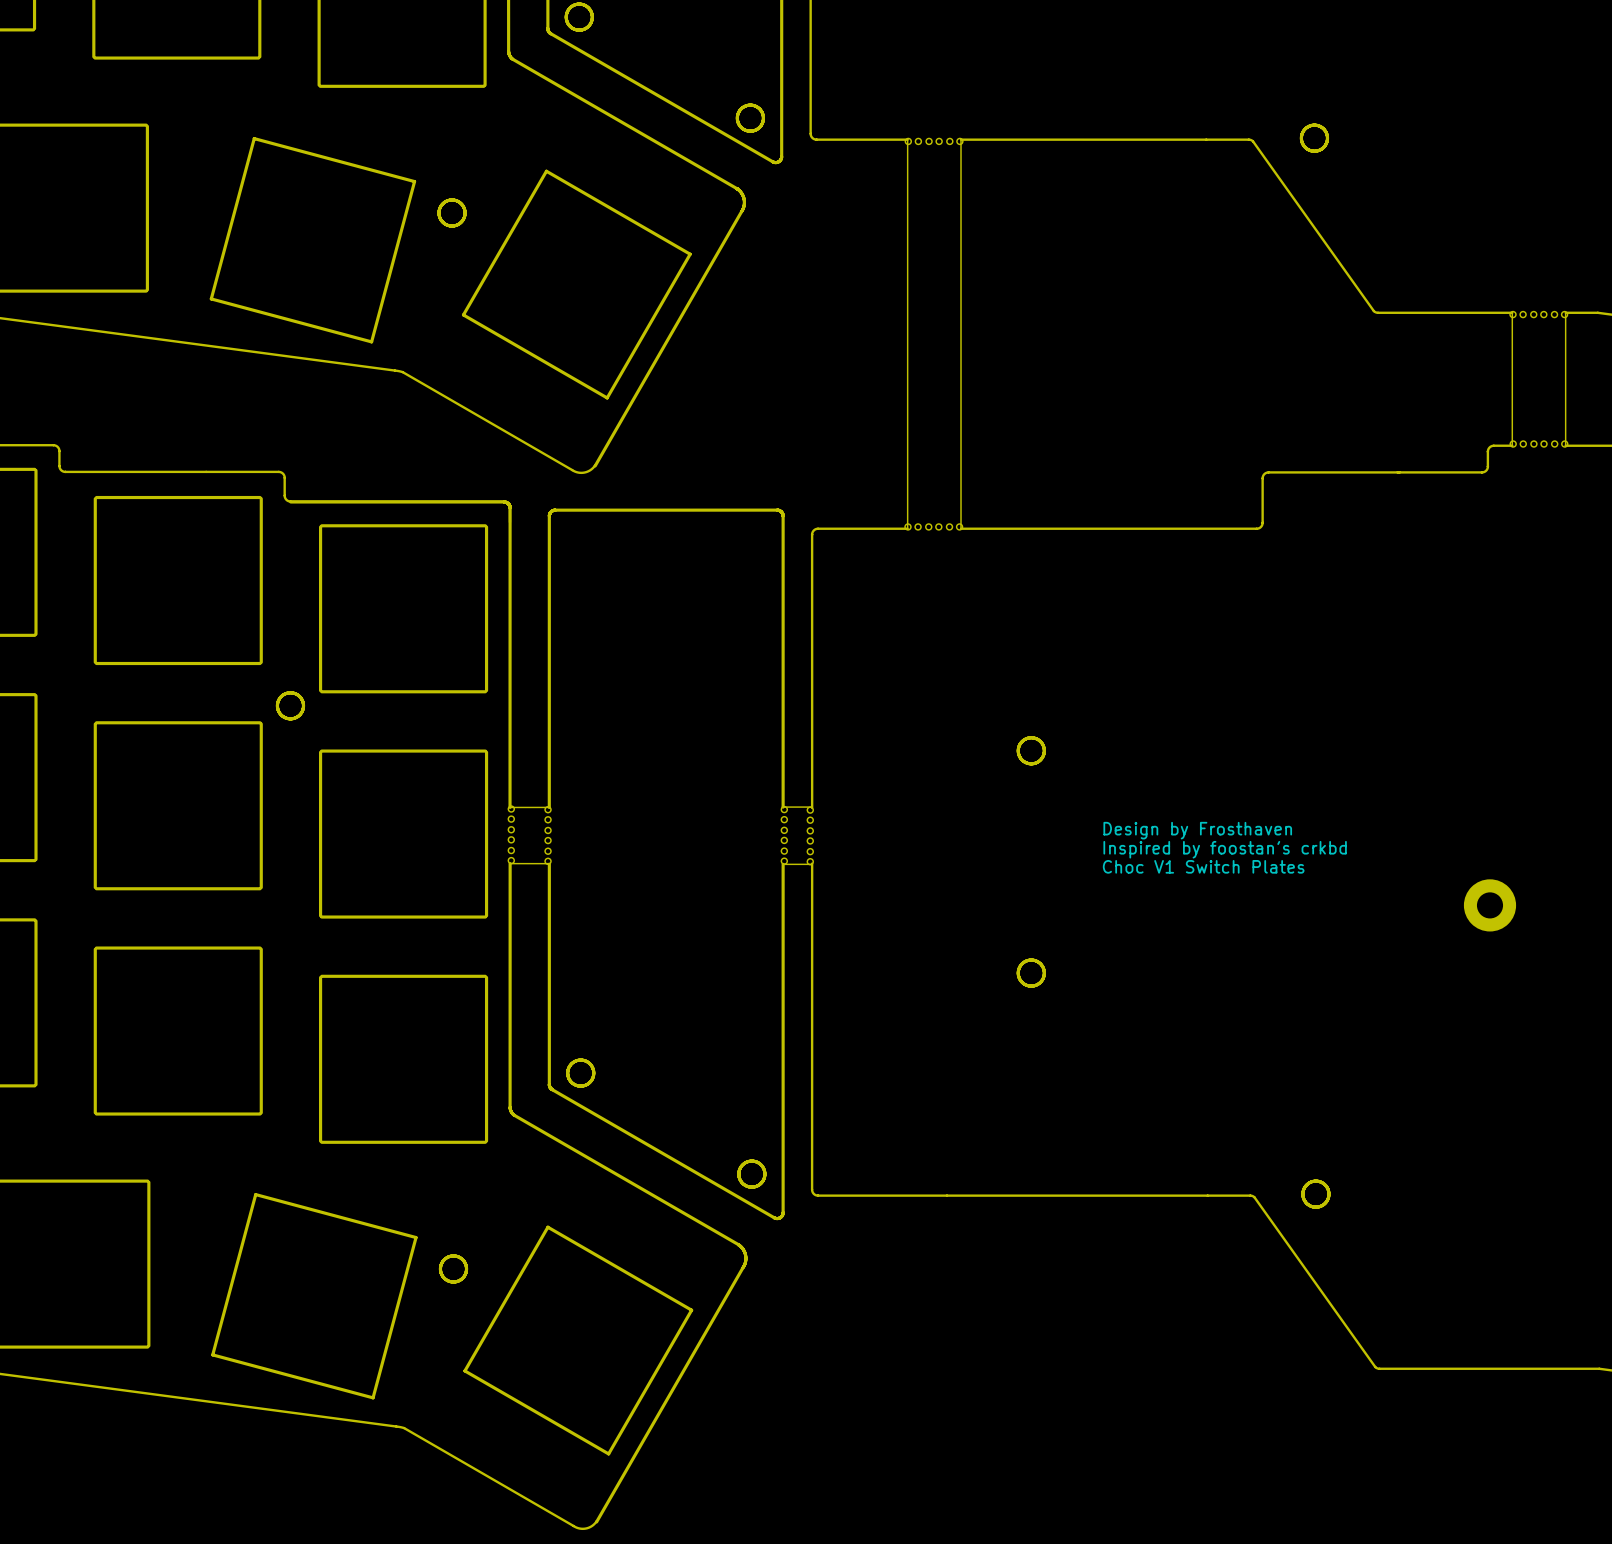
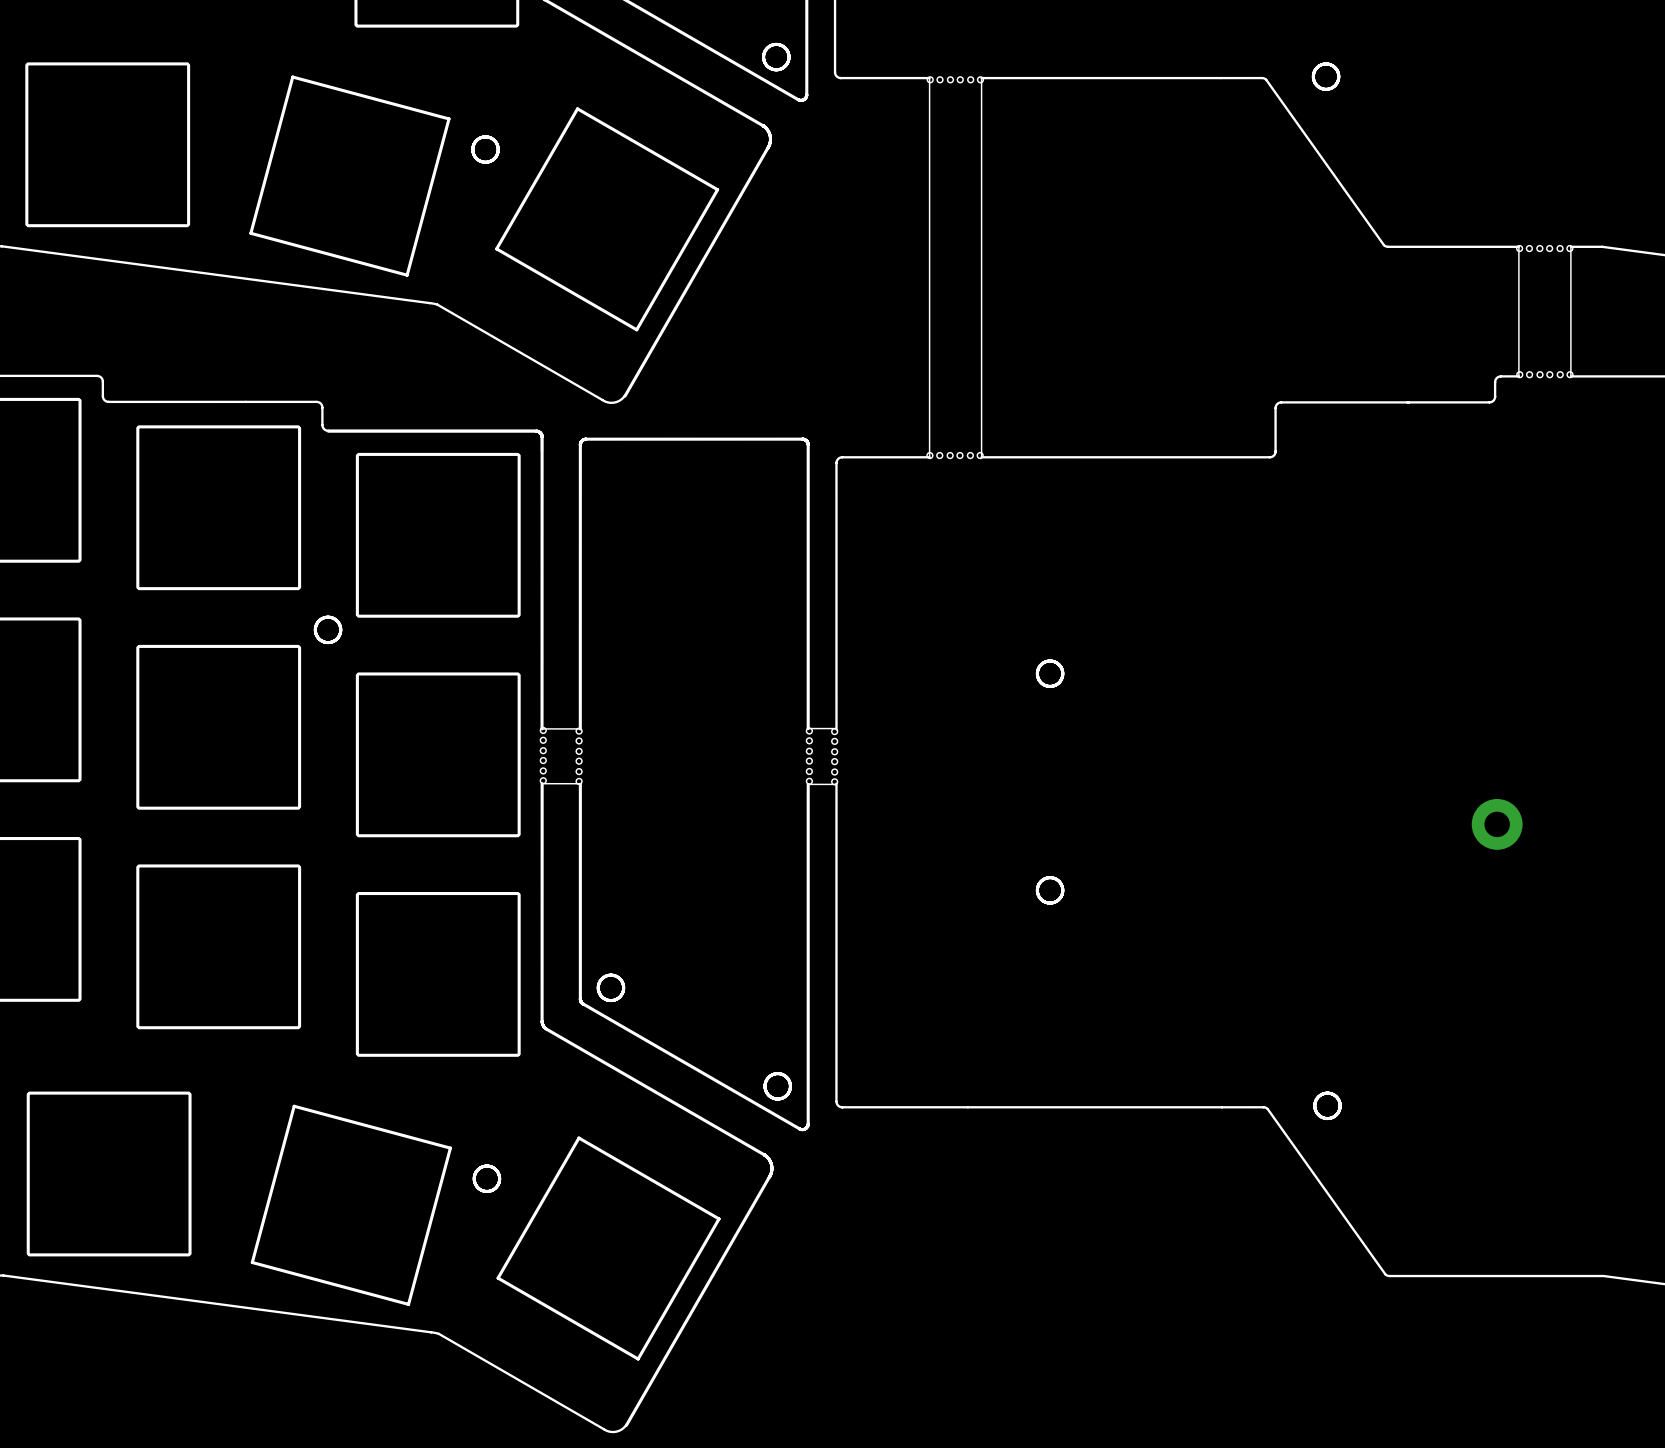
text: Design by Frosthaven (1197, 830) -> none
text: Inspired by foostan's crkbd (1225, 849) -> none
text: Choc V1 Switch Plates (1203, 866) -> none

